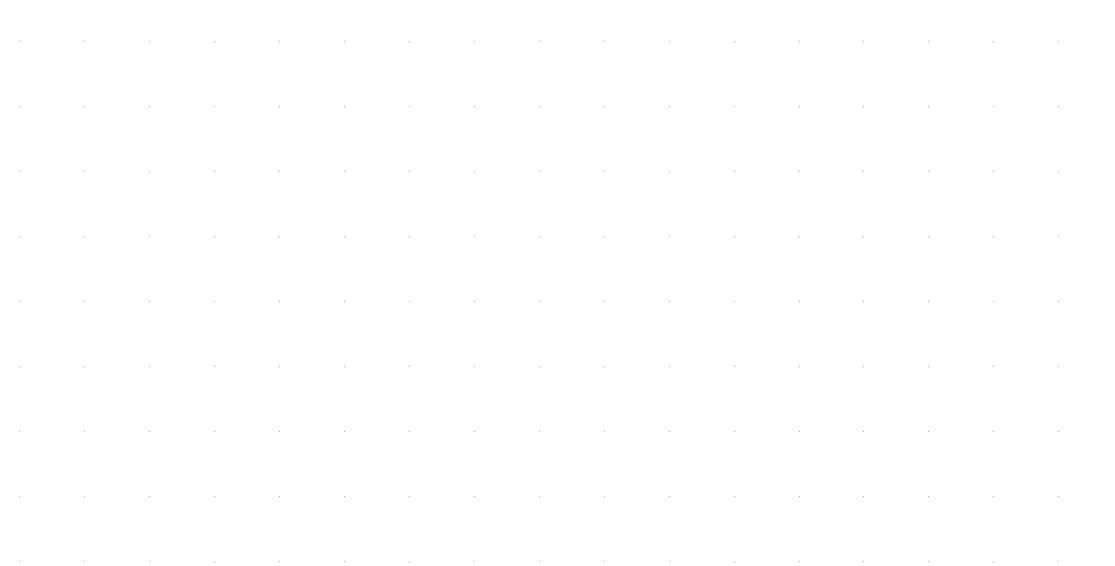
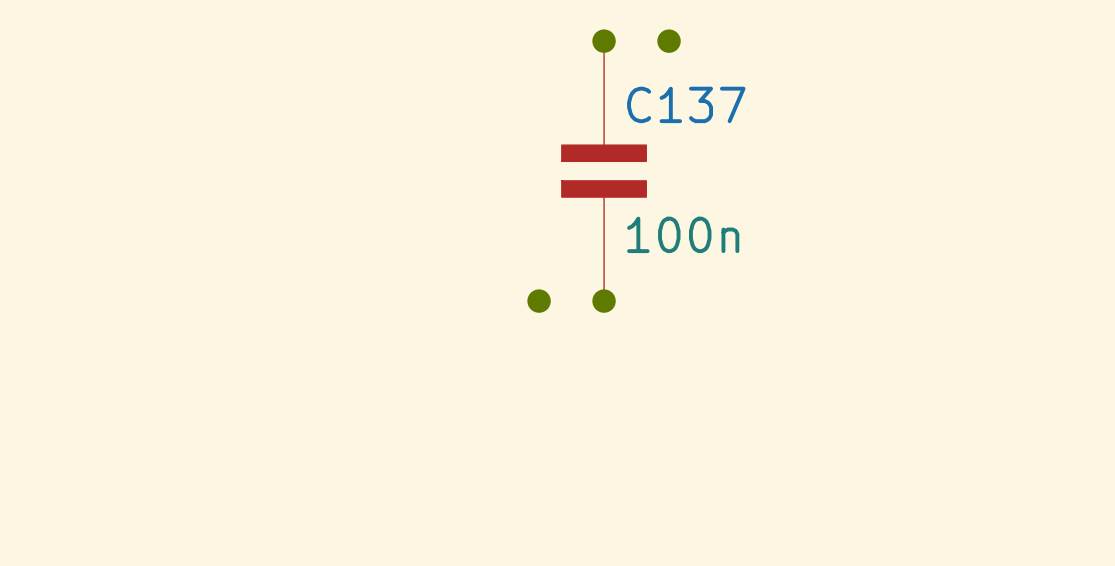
junction: none -> (604, 41)
junction: none -> (669, 41)
C137: none -> 100n (604, 171)
junction: none -> (539, 301)
junction: none -> (604, 301)

